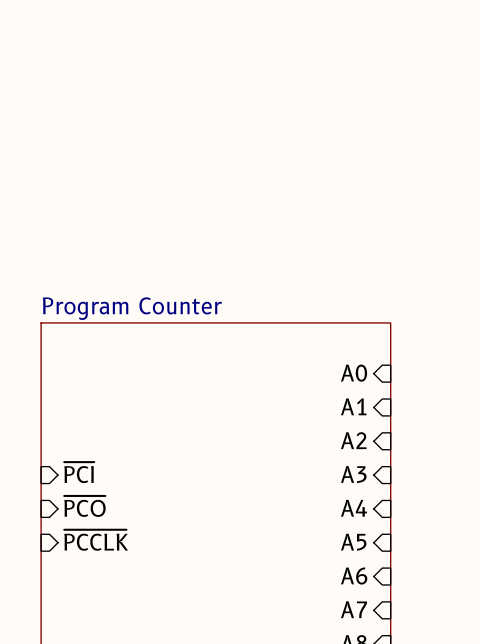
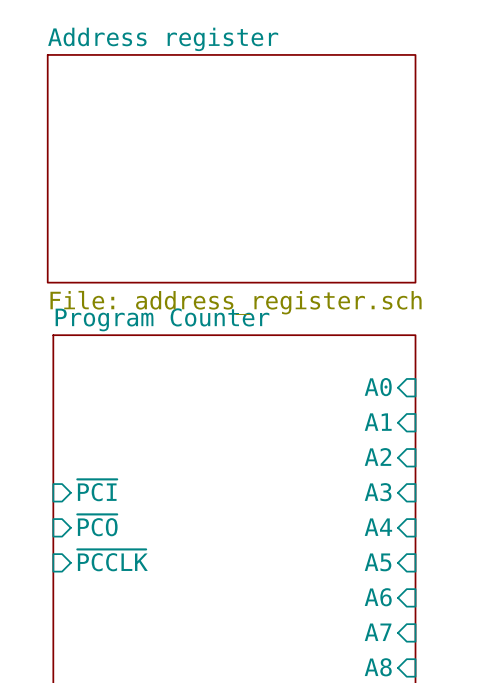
sheet Address register: none -> File: address_register.sch (231, 168)

